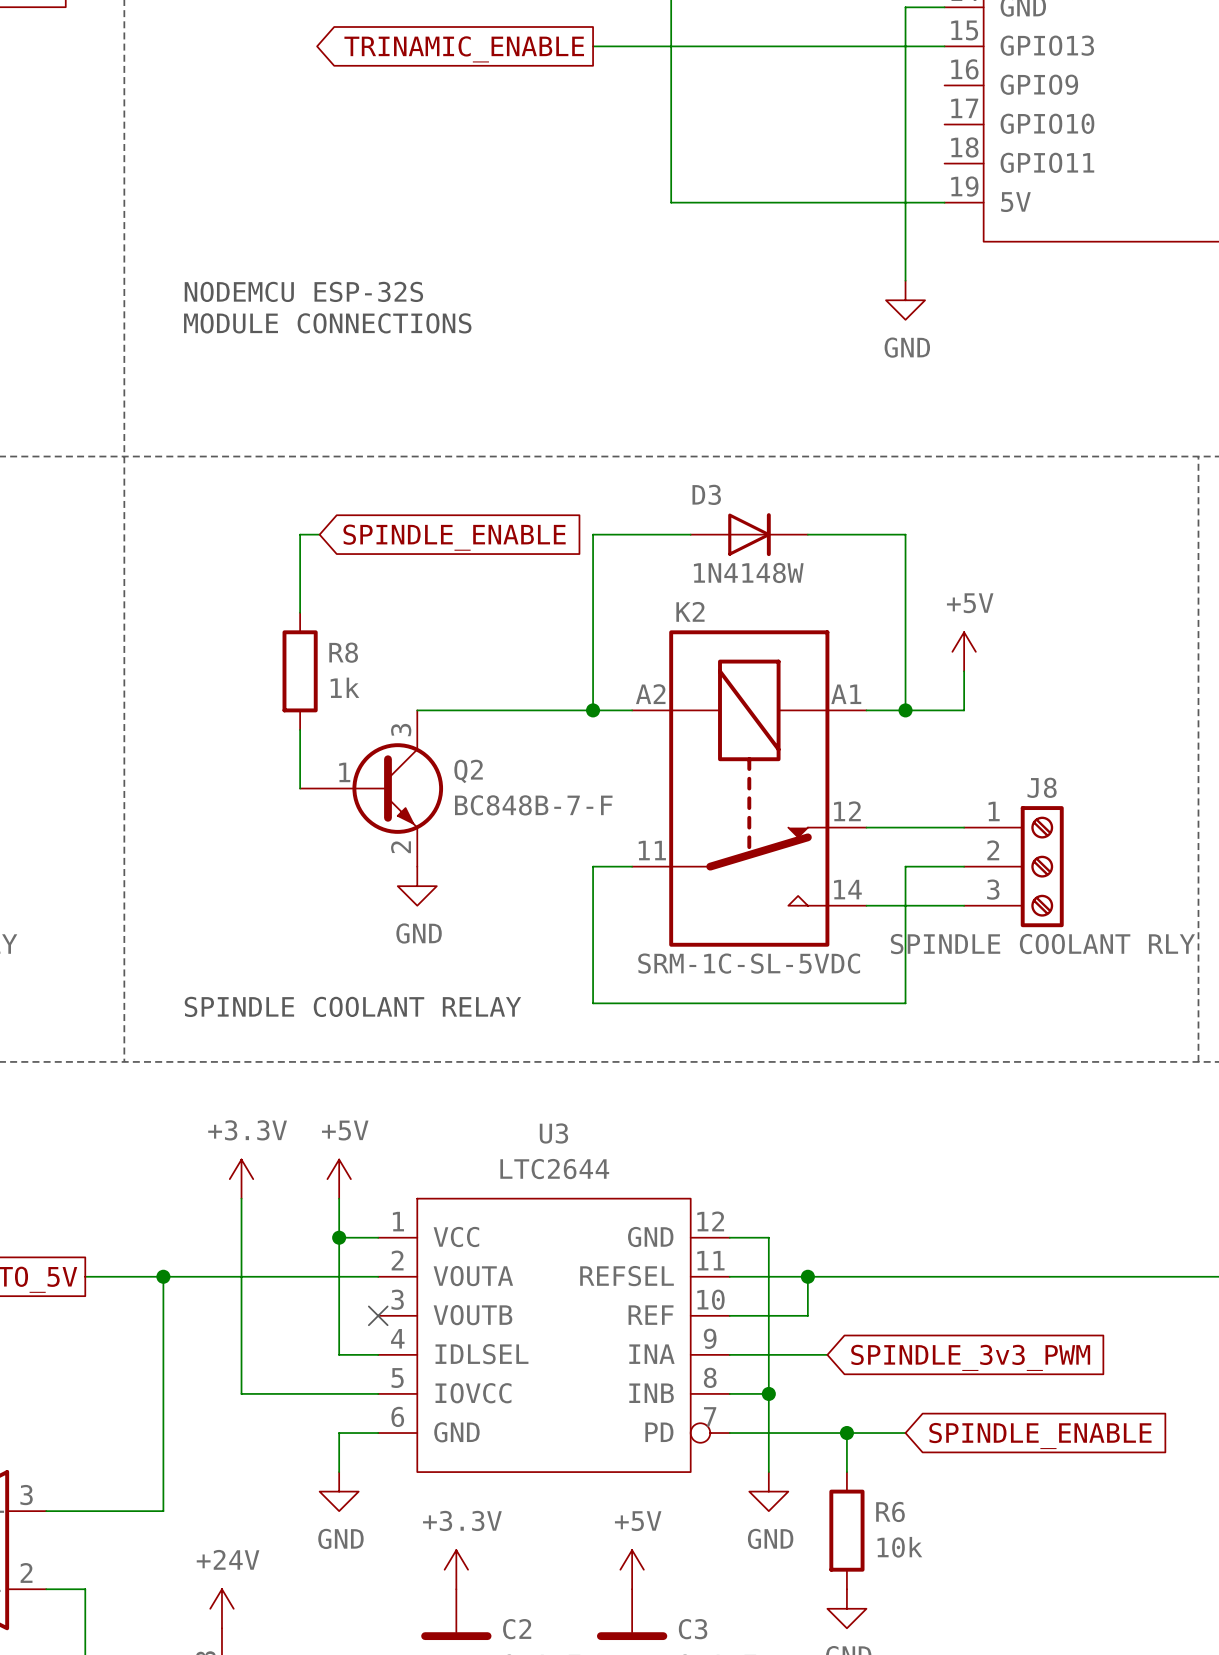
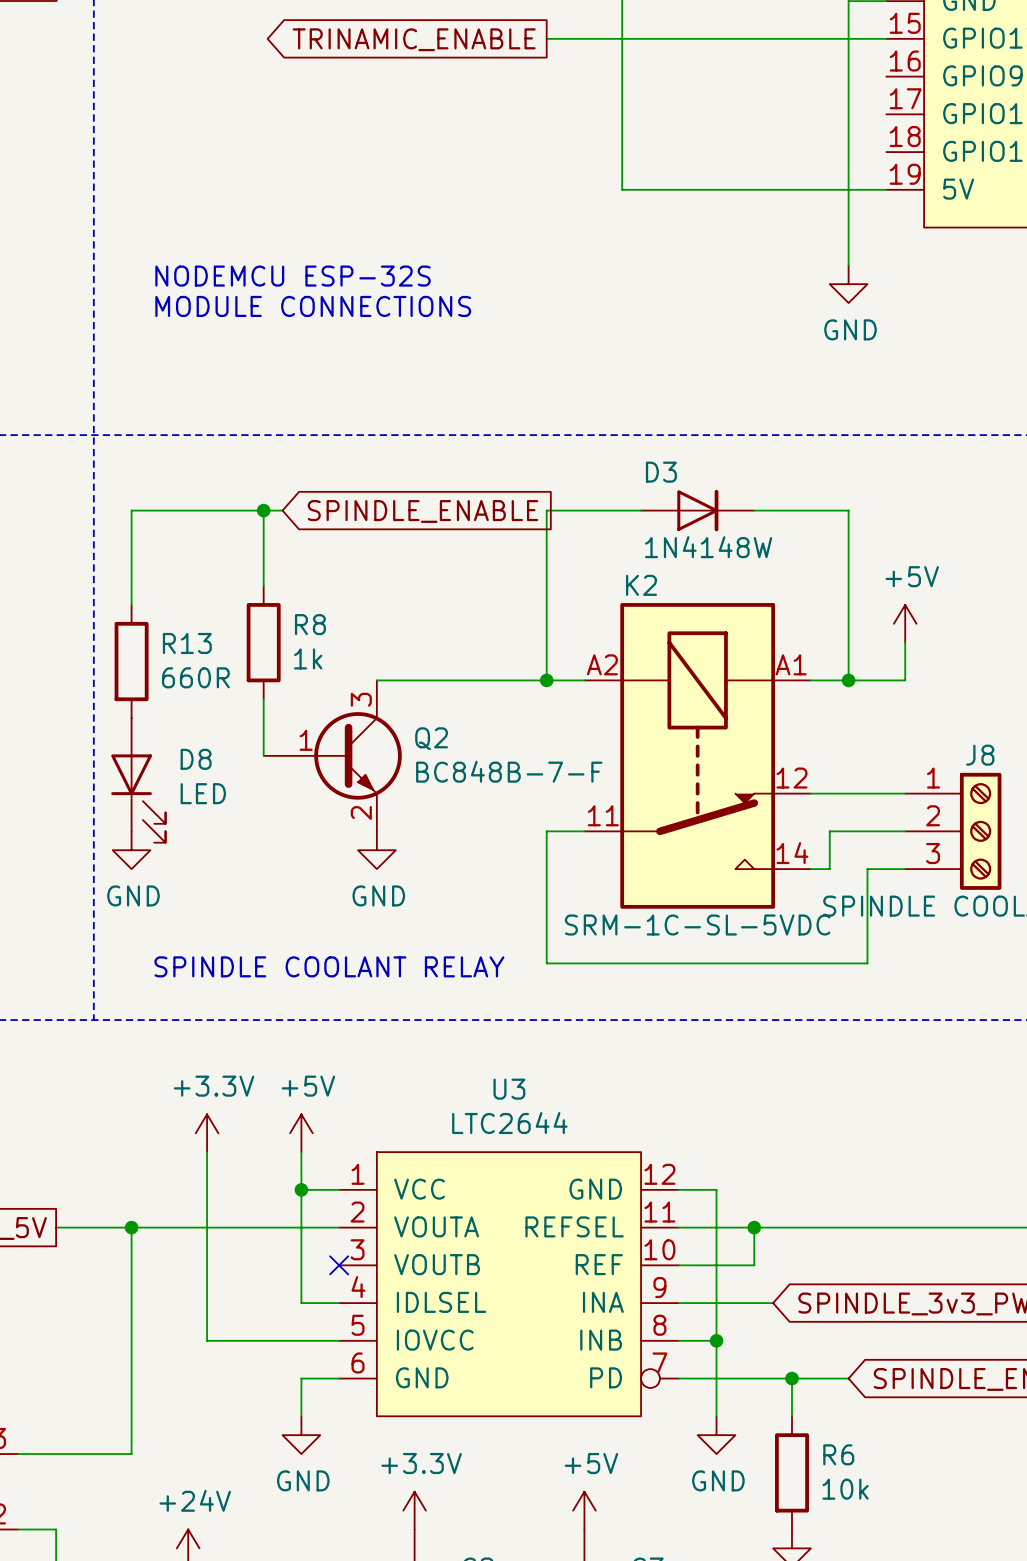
wire: none -> (263, 510) (131, 510) (131, 604)
junction: none -> (263, 510)
R13: none -> 660R (131, 661)
D8: none -> LED (138, 780)
wire: (905, 866) (905, 1003) -> (867, 869) (867, 963) (848, 963)
power symbol: none -> GND (131, 850)
wire: (886, 905) (925, 905) -> (829, 869) (829, 831) (848, 831)

